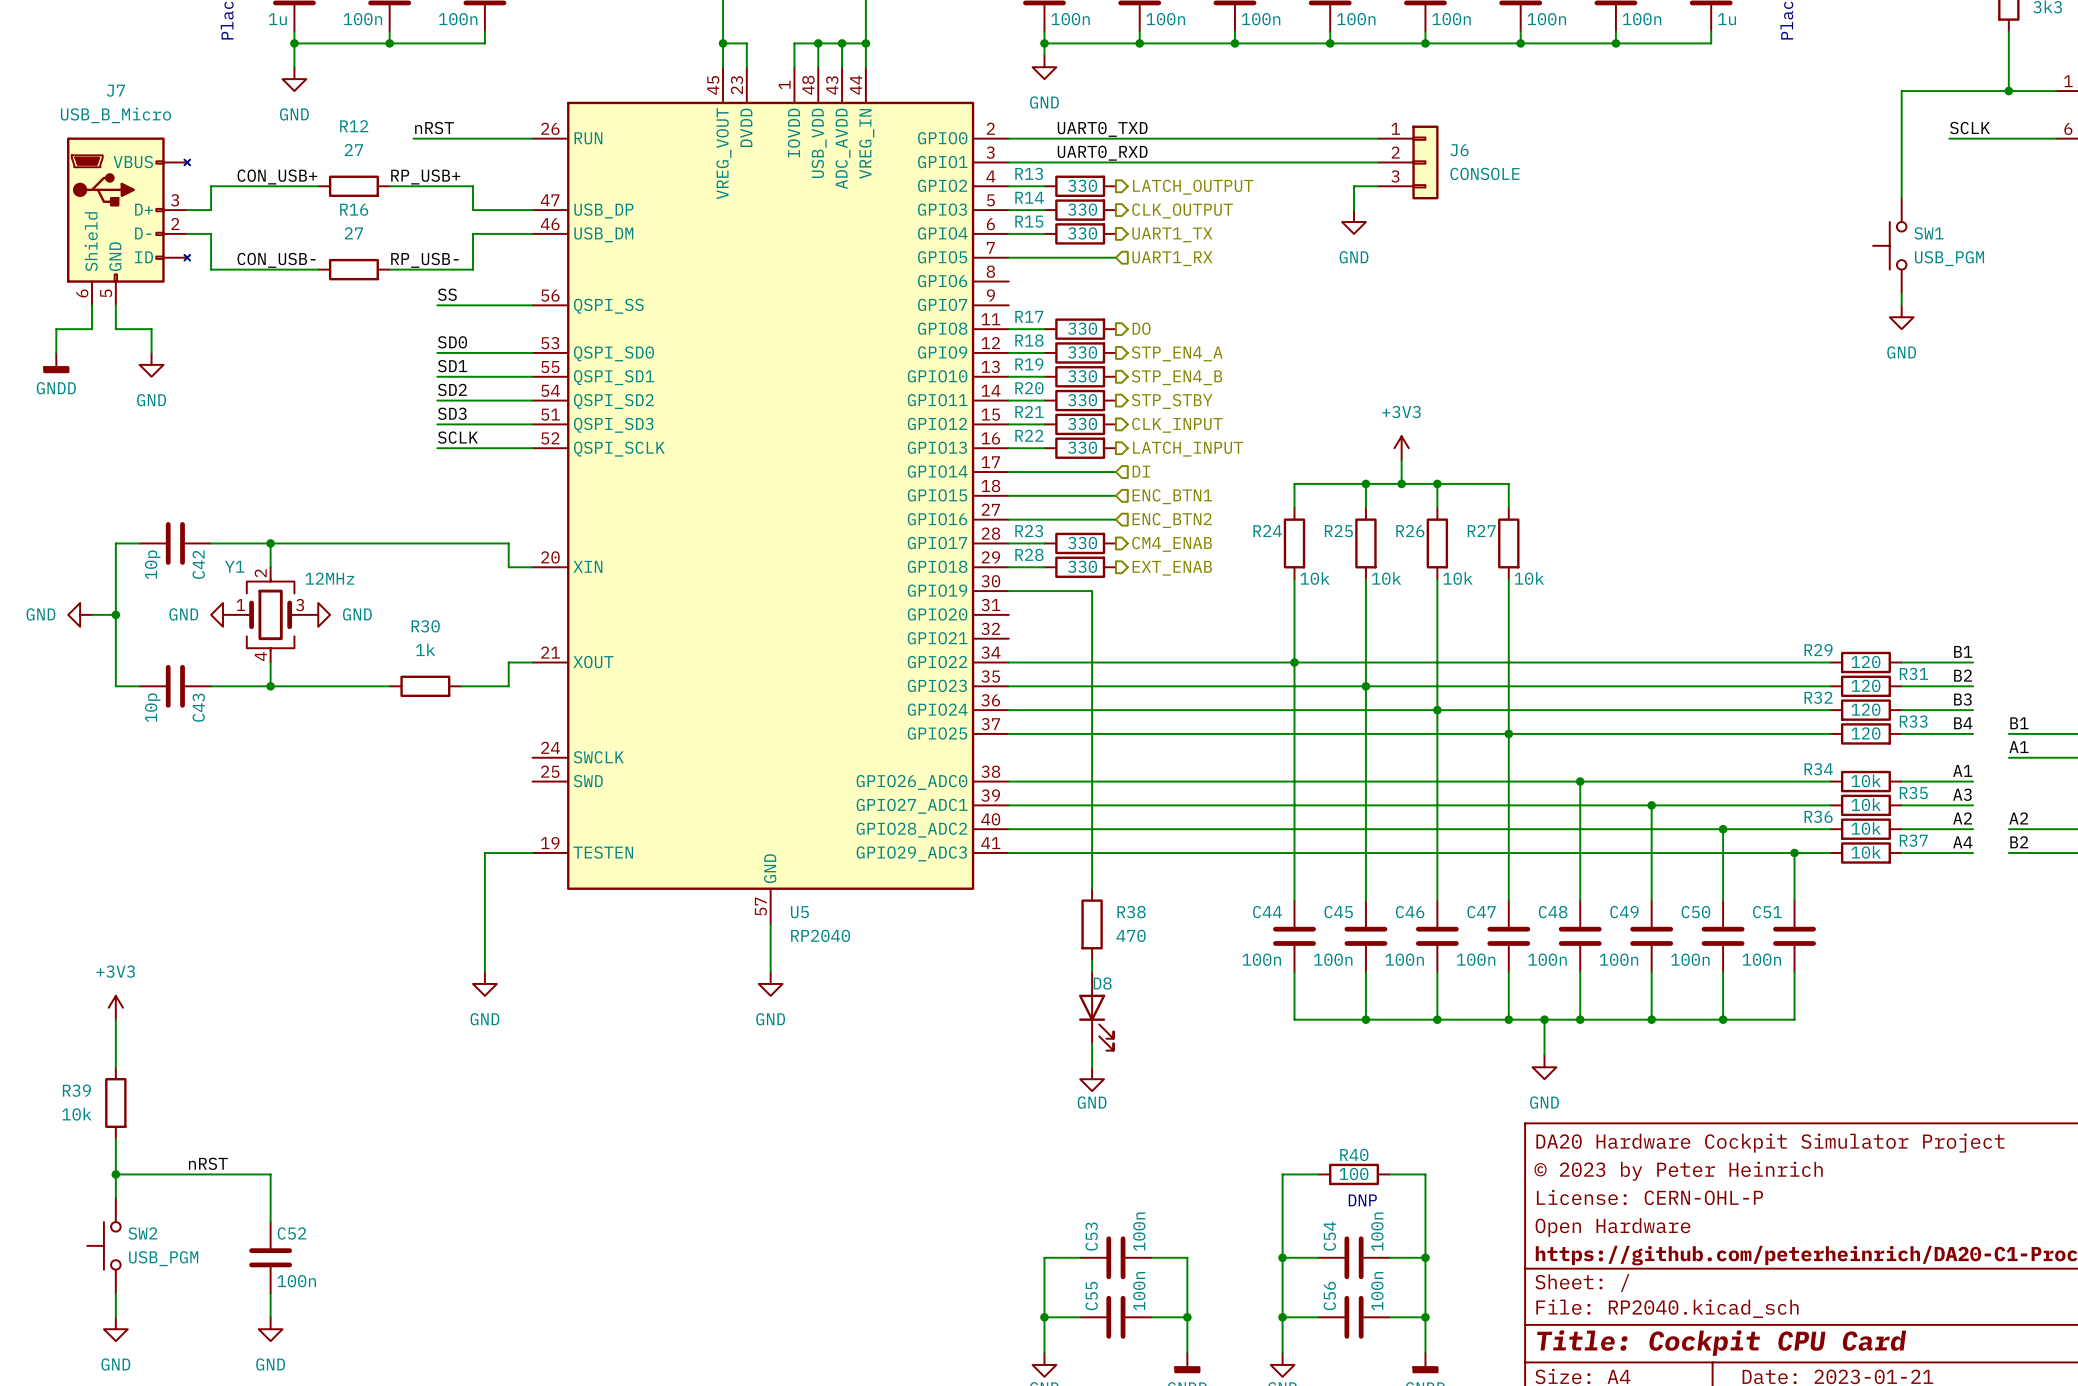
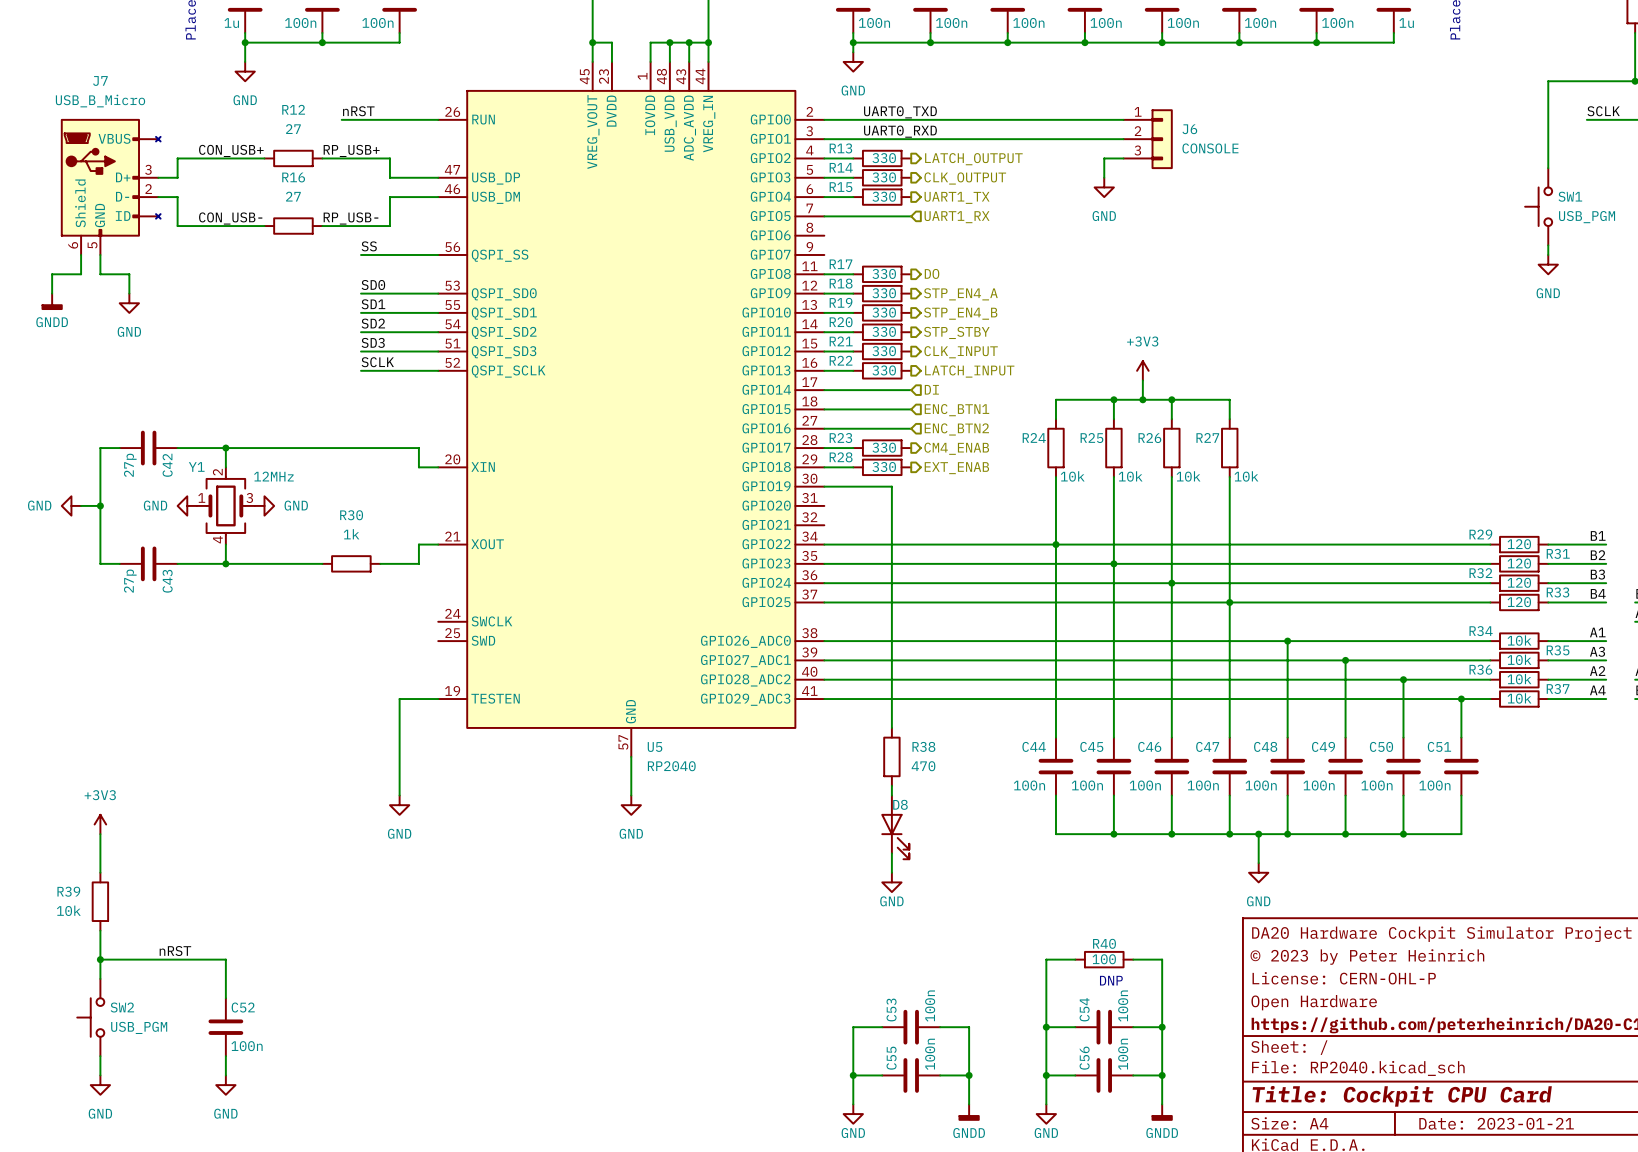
C42 value: 10p (152, 564) -> 27p (130, 465)
C43 value: 10p (152, 707) -> 27p (130, 581)

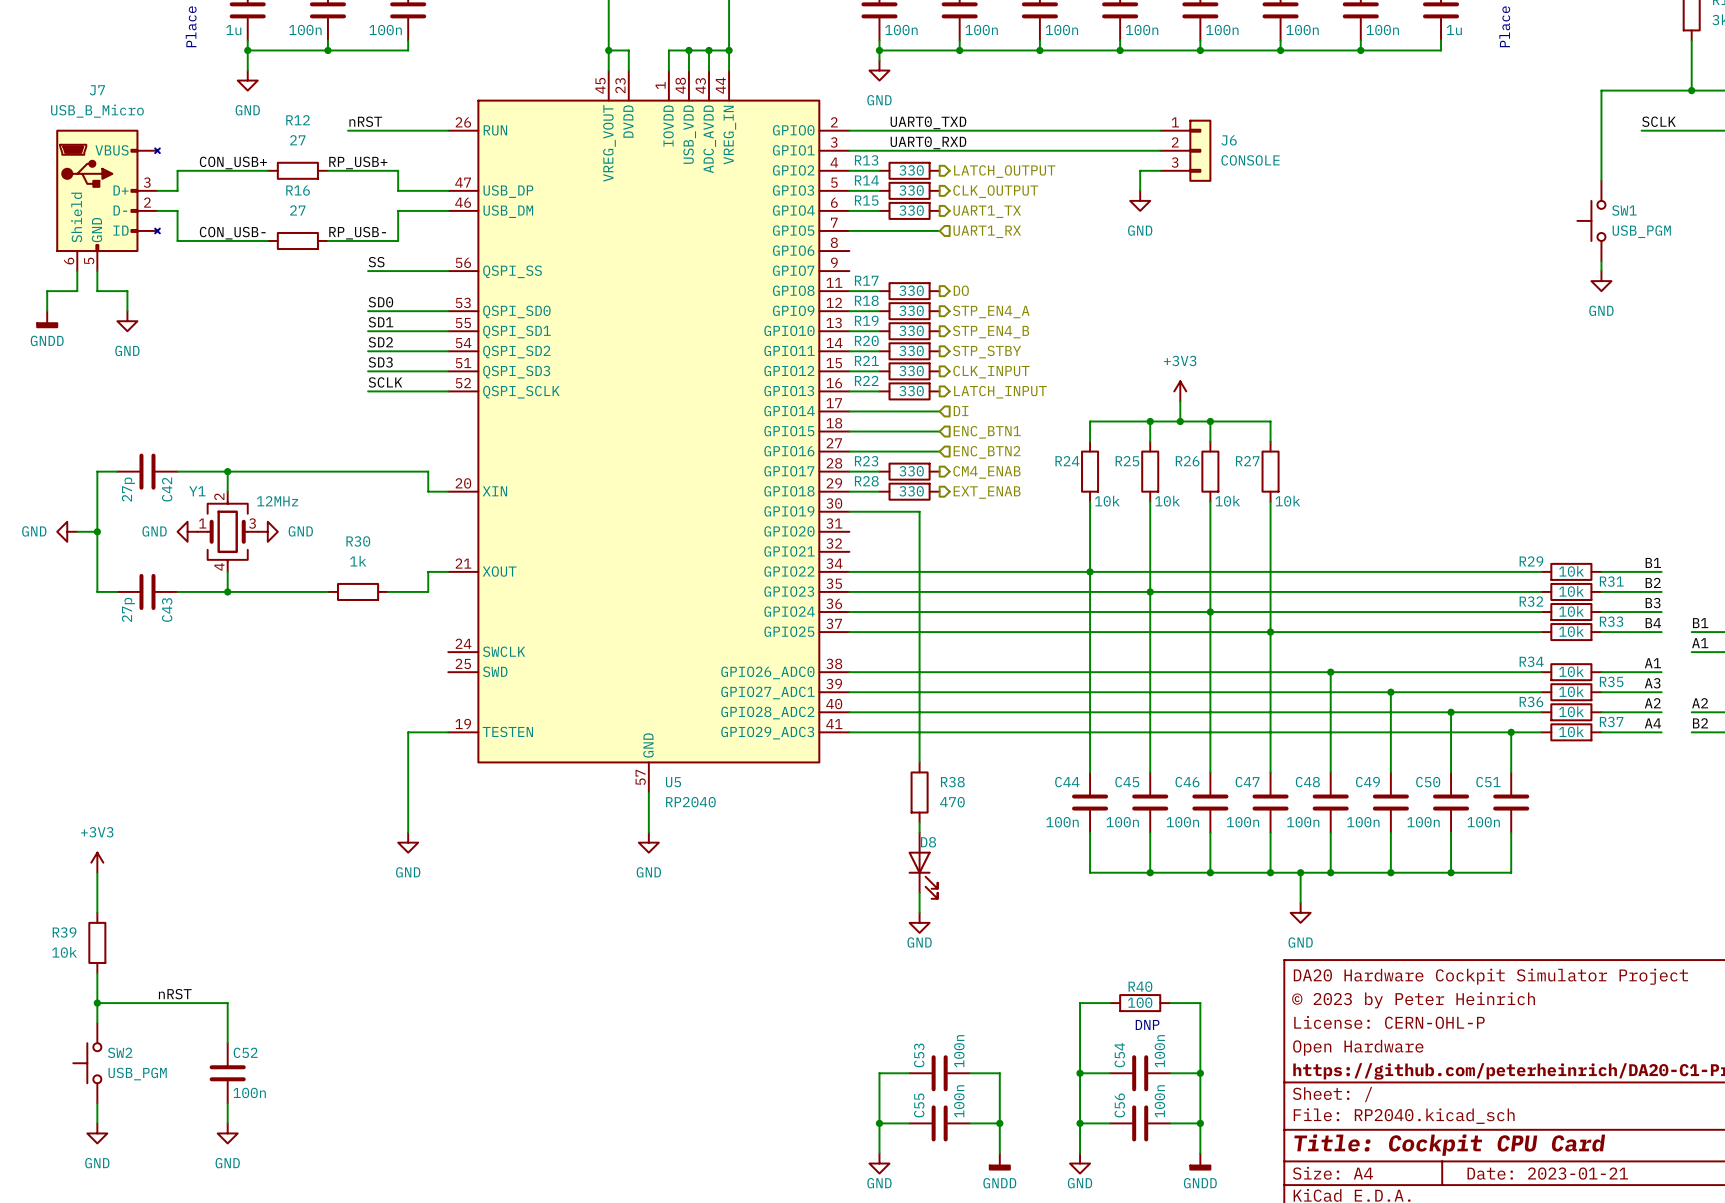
R29 value: 120 (1519, 544) -> 10k (1571, 571)
R31 value: 120 (1519, 563) -> 10k (1571, 591)
R32 value: 120 (1519, 582) -> 10k (1571, 611)
R33 value: 120 (1519, 602) -> 10k (1571, 631)

